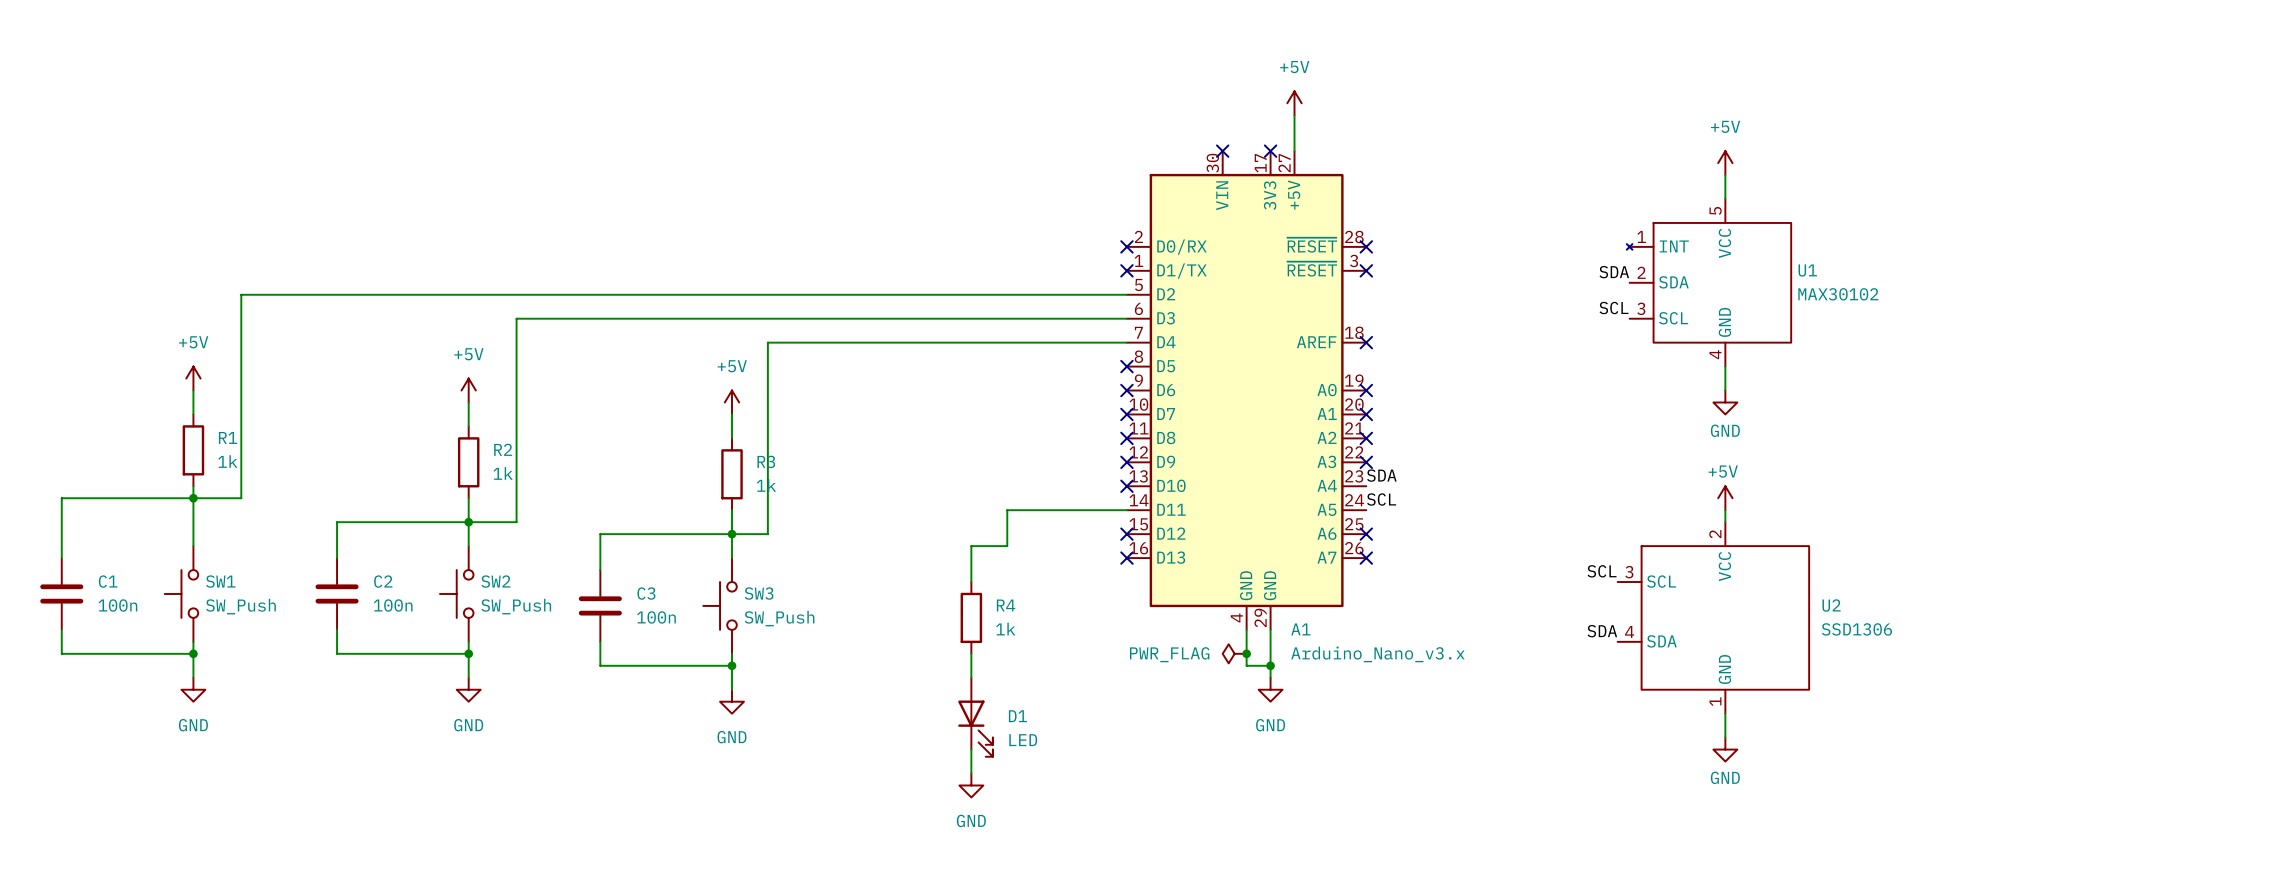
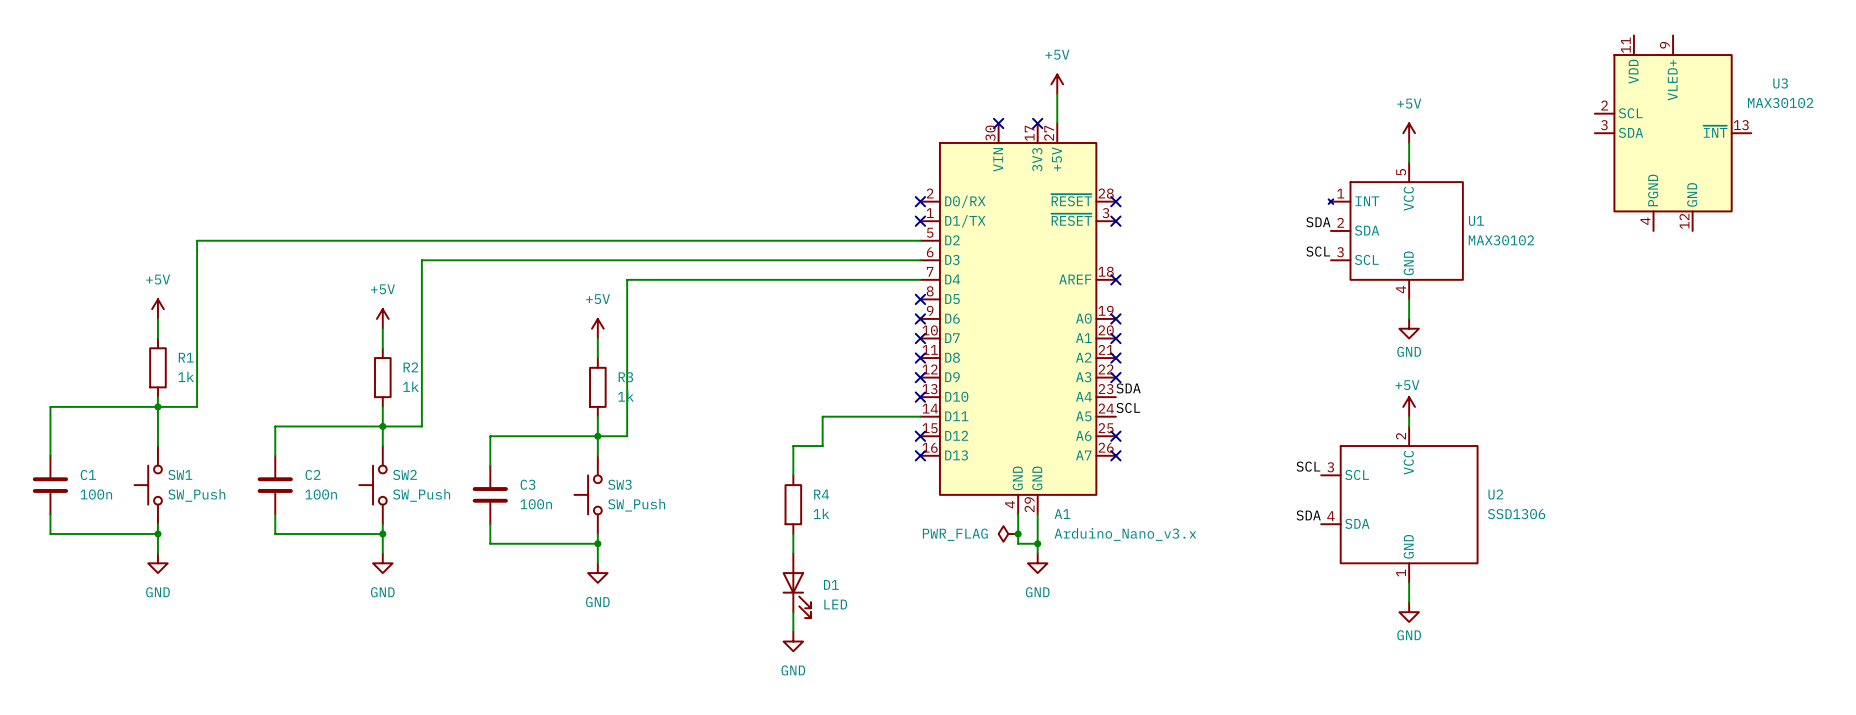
U3: none -> MAX30102 (1673, 133)

